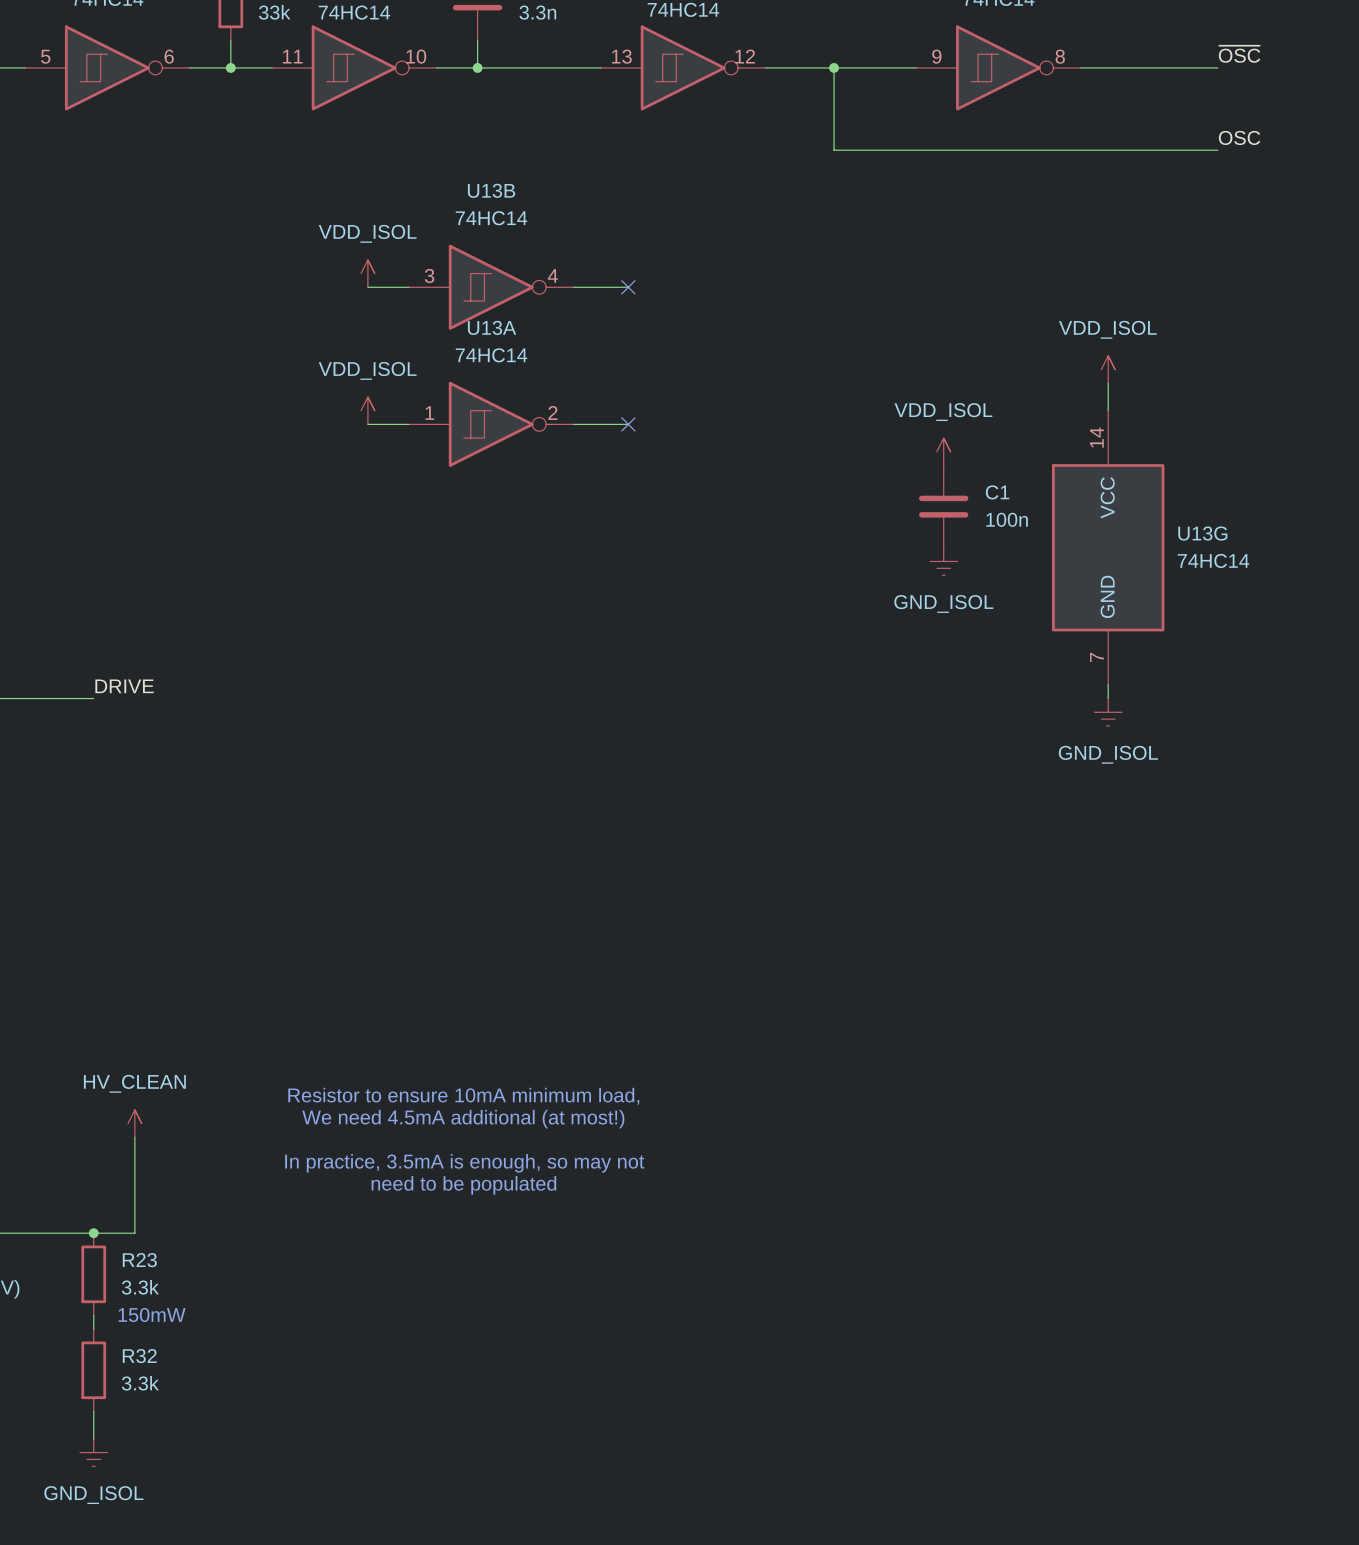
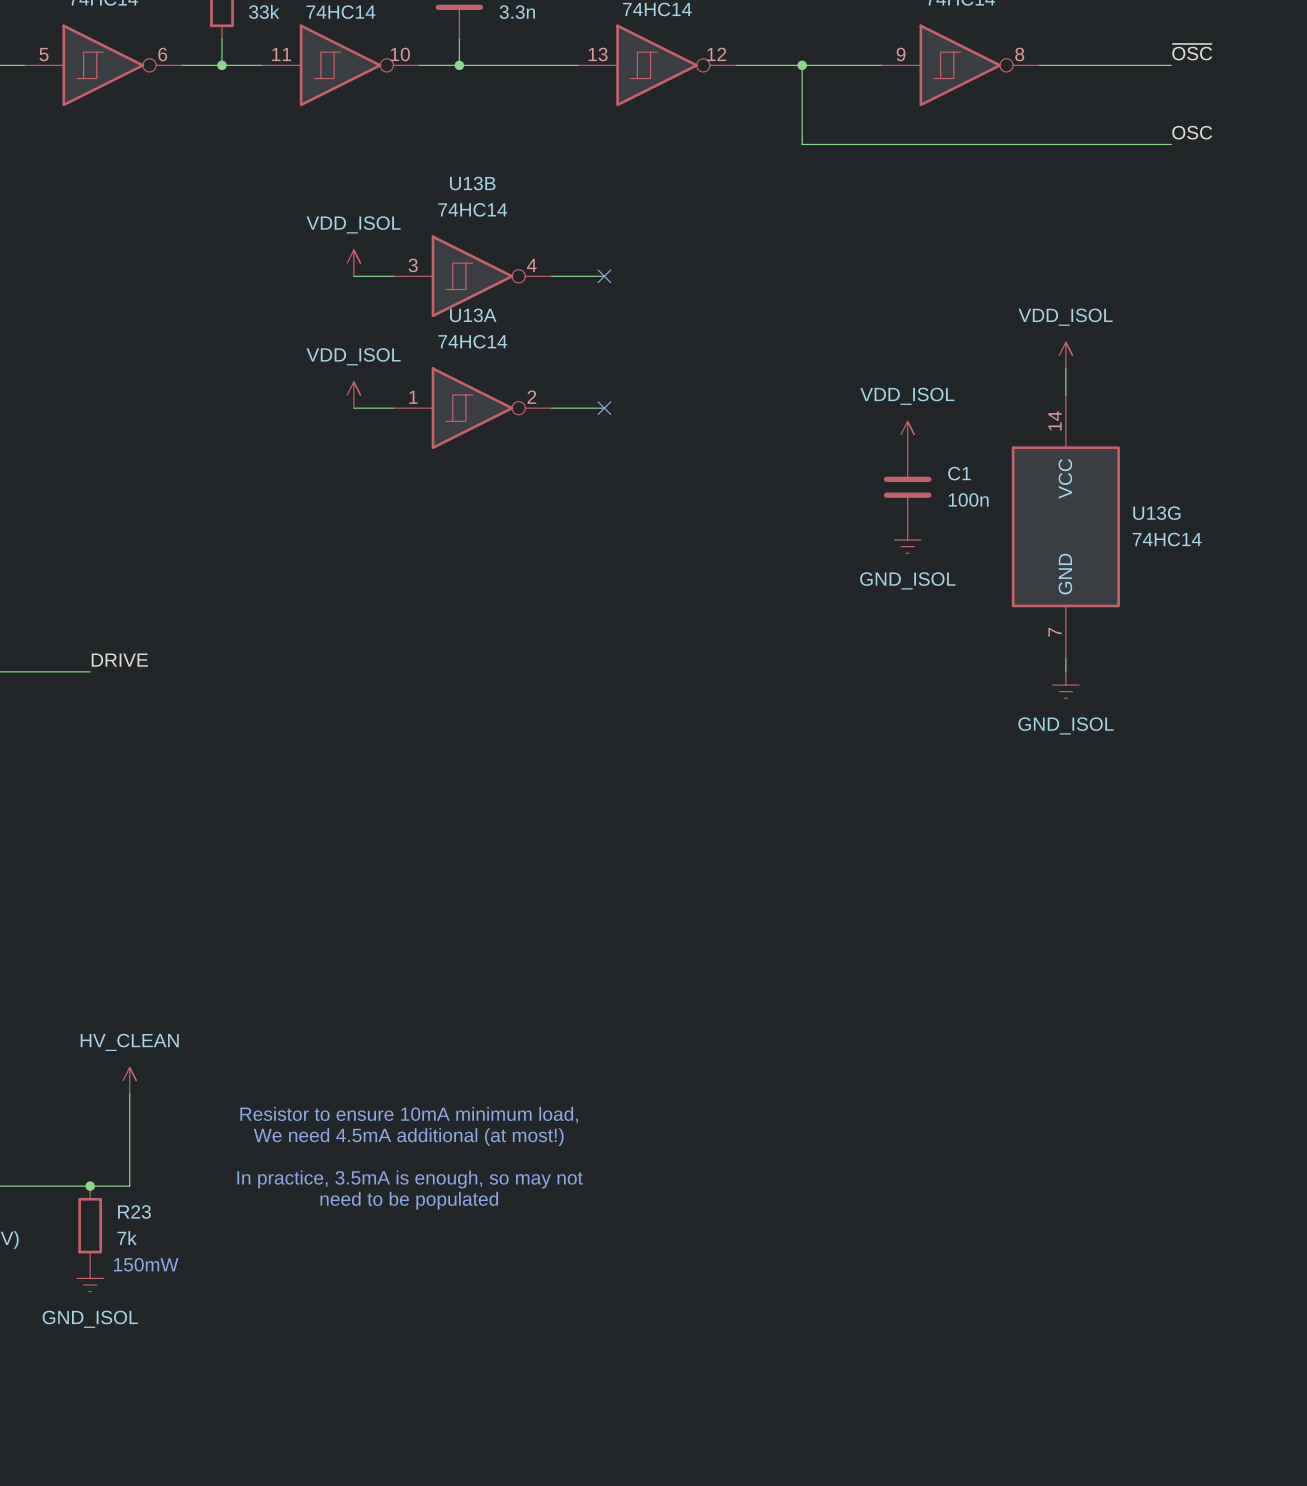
text position: Resistor to ensure 10mA minimum load, (463, 1096) -> Resistor to ensure 10mA minimum load, (409, 1115)
text position: We need 4.5mA additional (at most!) (463, 1119) -> We need 4.5mA additional (at most!) (408, 1137)
text position: In practice, 3.5mA is enough, so may not (464, 1163) -> In practice, 3.5mA is enough, so may not (410, 1179)
text position: need to be populated (463, 1185) -> need to be populated (409, 1200)
R23 value: 3.3k (140, 1287) -> 7k (127, 1238)
R32: 3.3k (93, 1370) -> none
wire: (93, 1411) (93, 1438) -> none
power symbol position: GND_ISOL (93, 1452) -> GND_ISOL (90, 1278)

